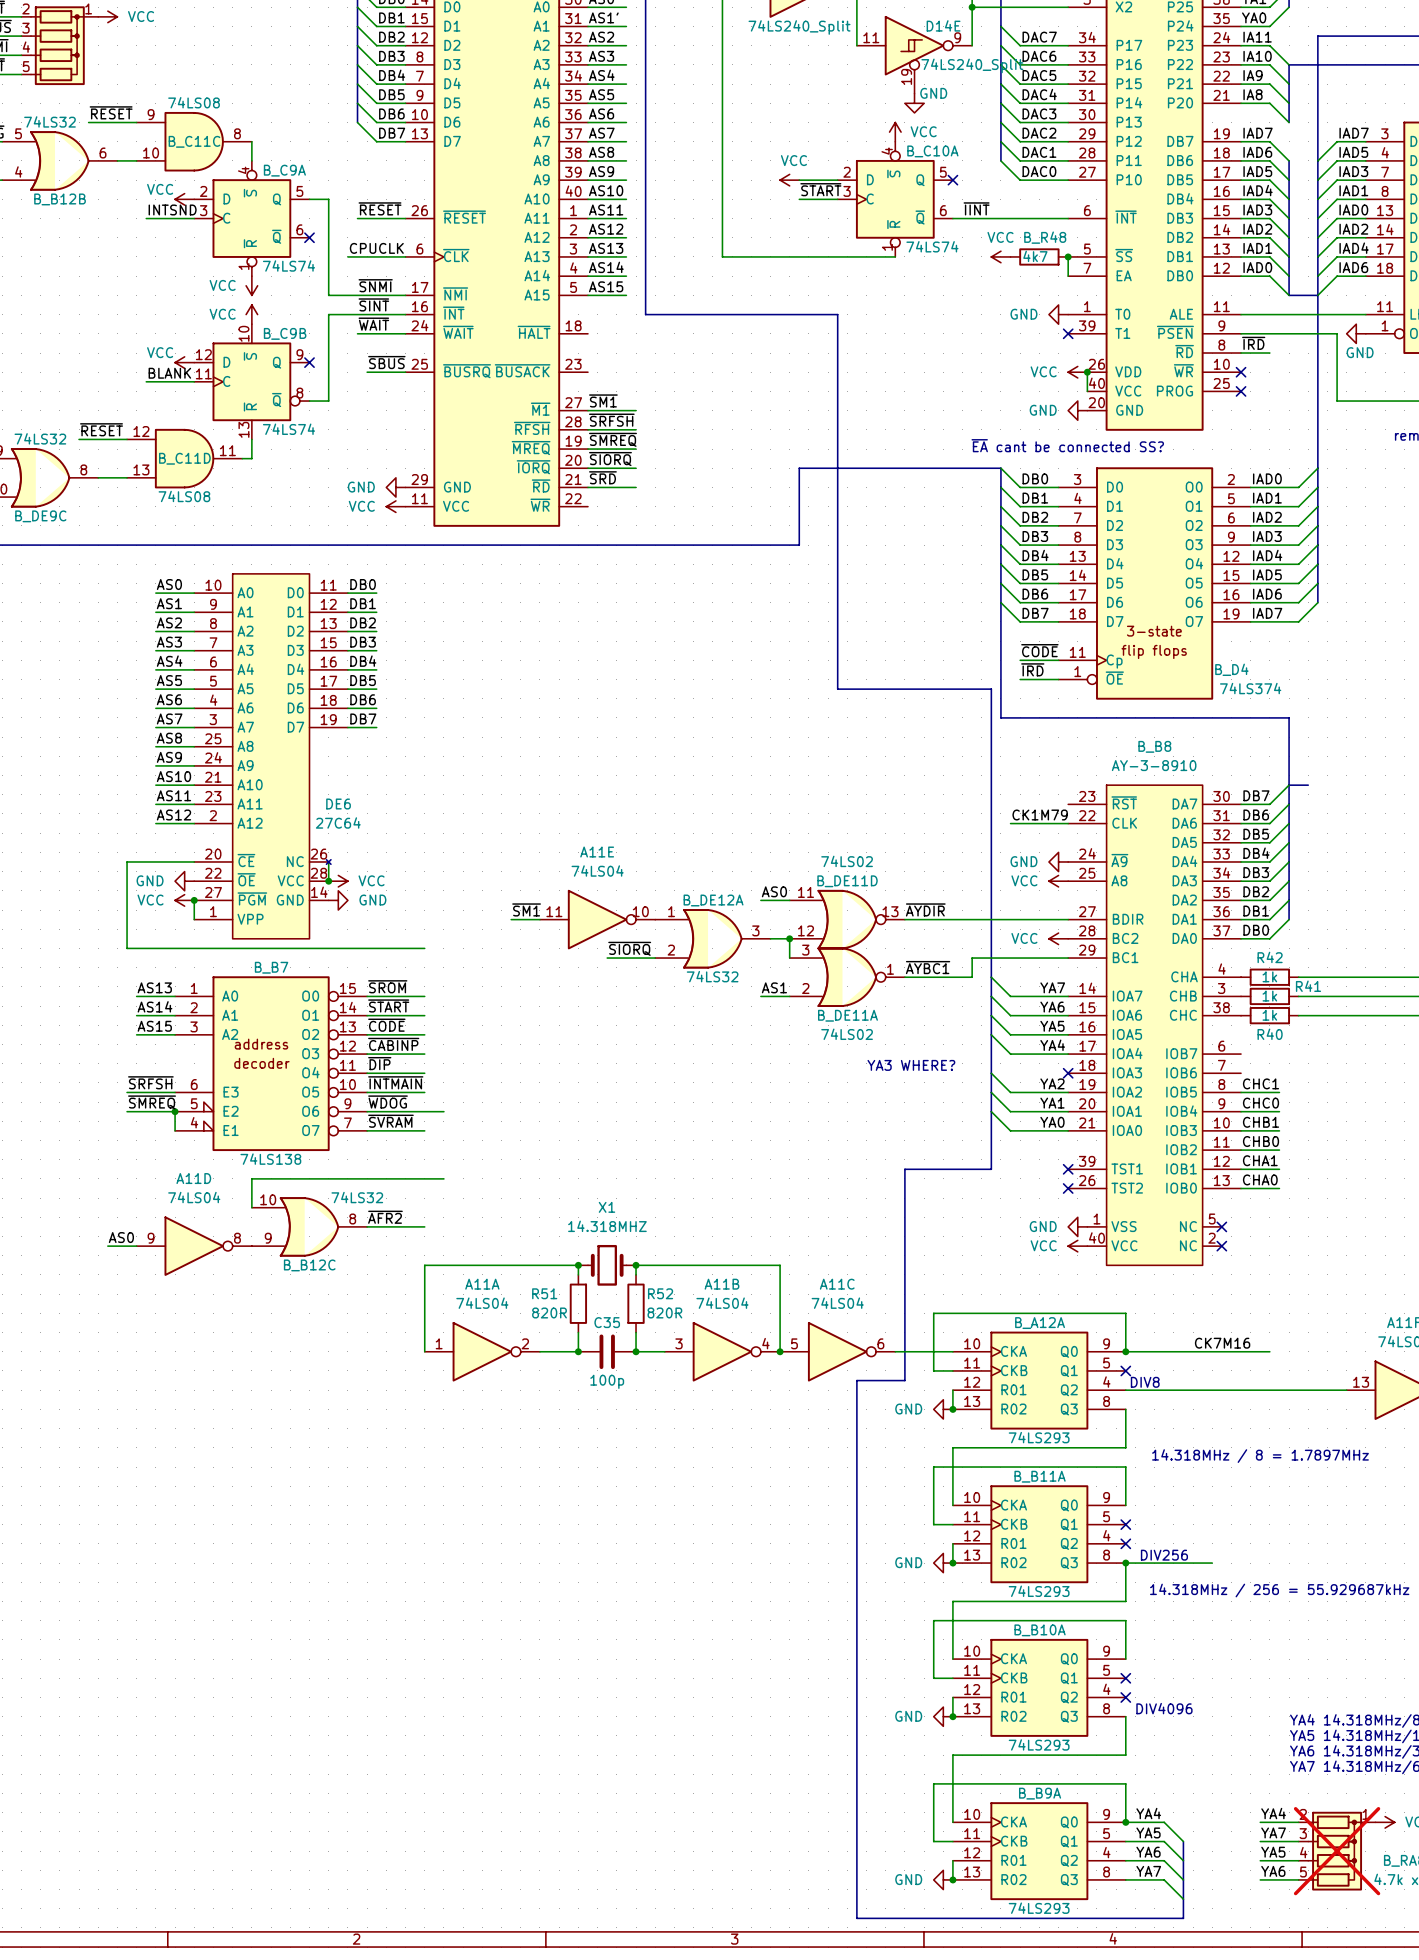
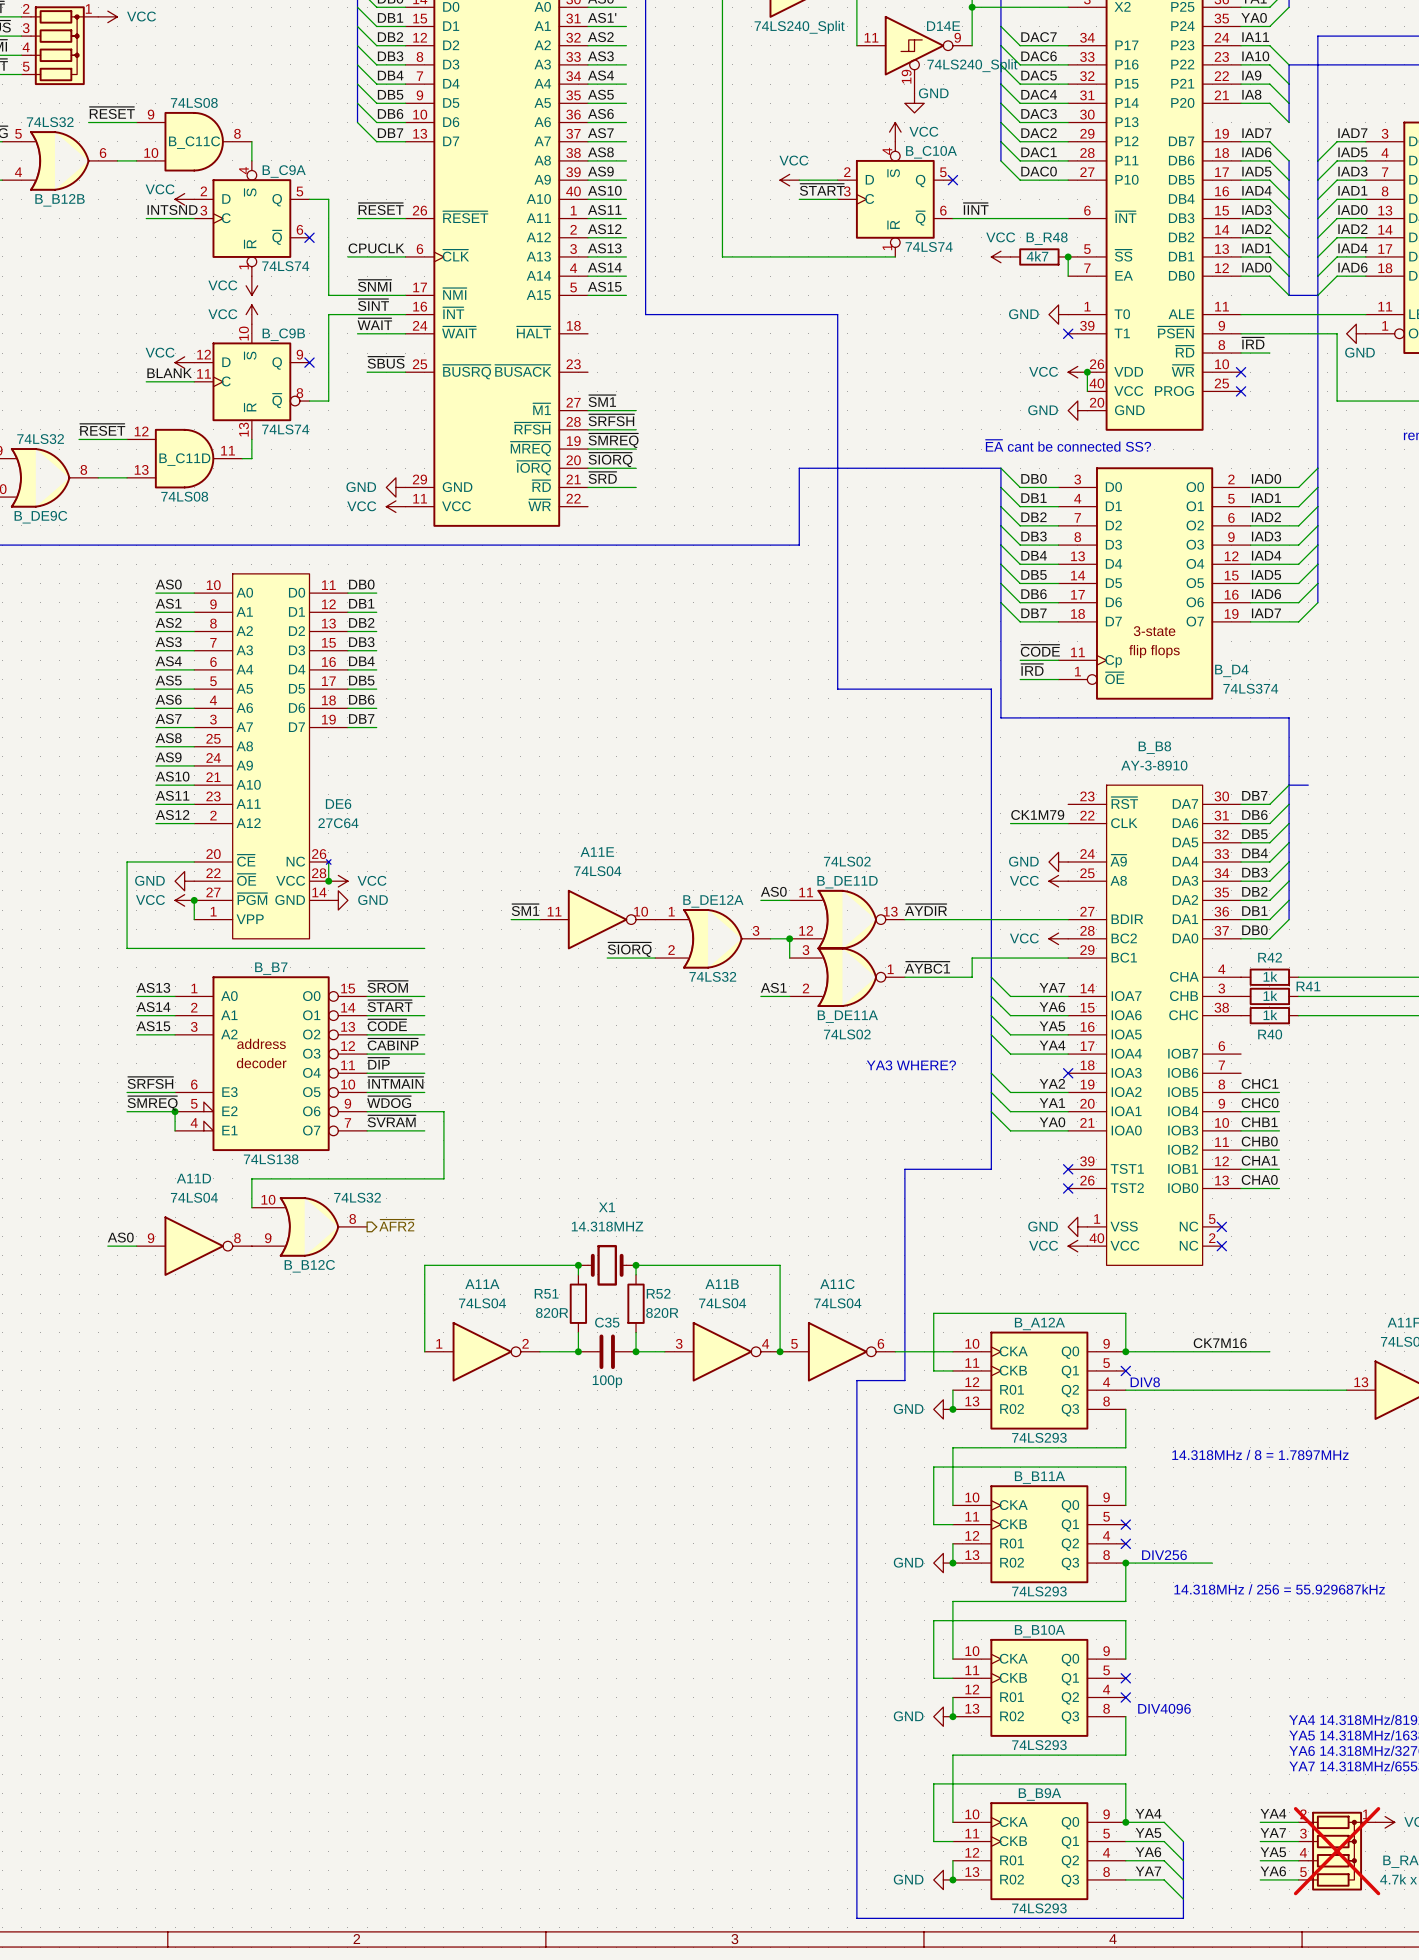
wire: none -> (443, 1111) (443, 1178)
label: ~{AFR2} (385, 1217) -> none
hierarchical label: none -> ~{AFR2} (396, 1225)
wire: (367, 1226) (424, 1226) -> none

